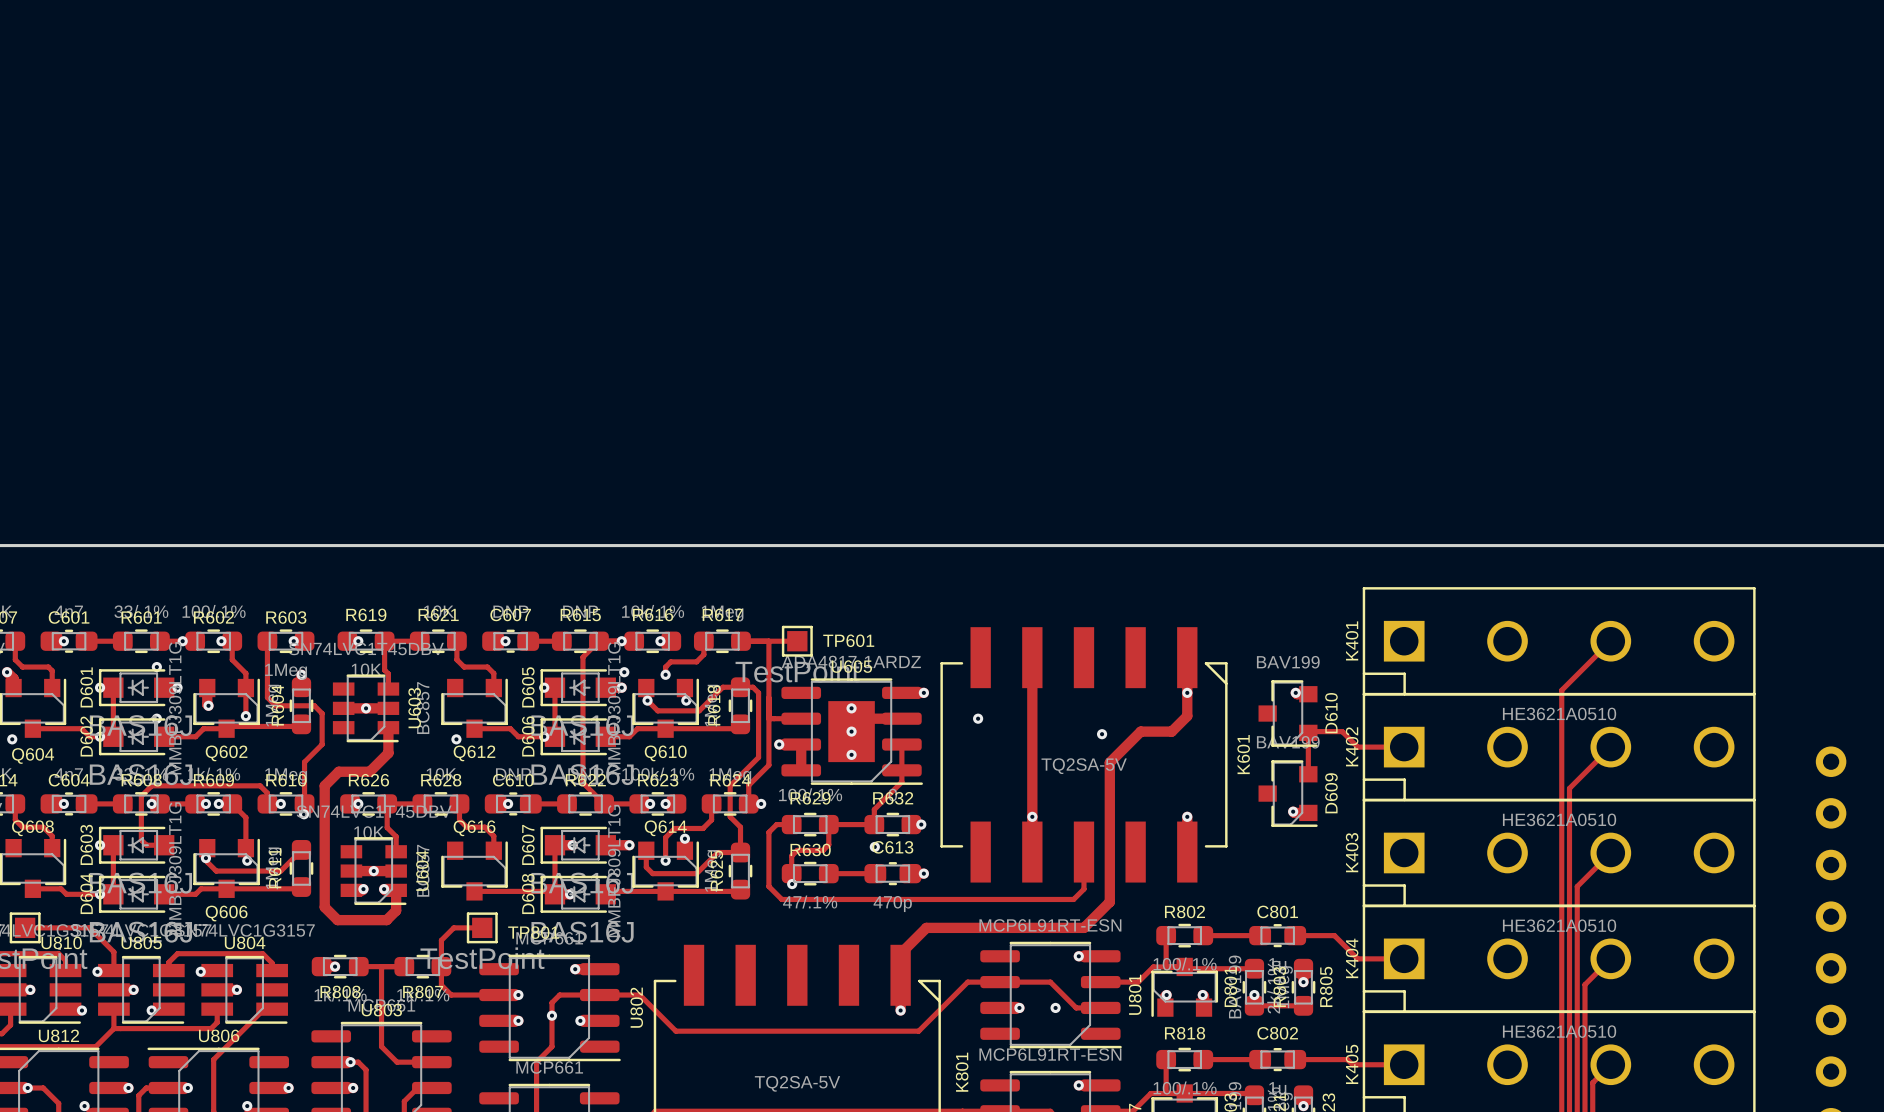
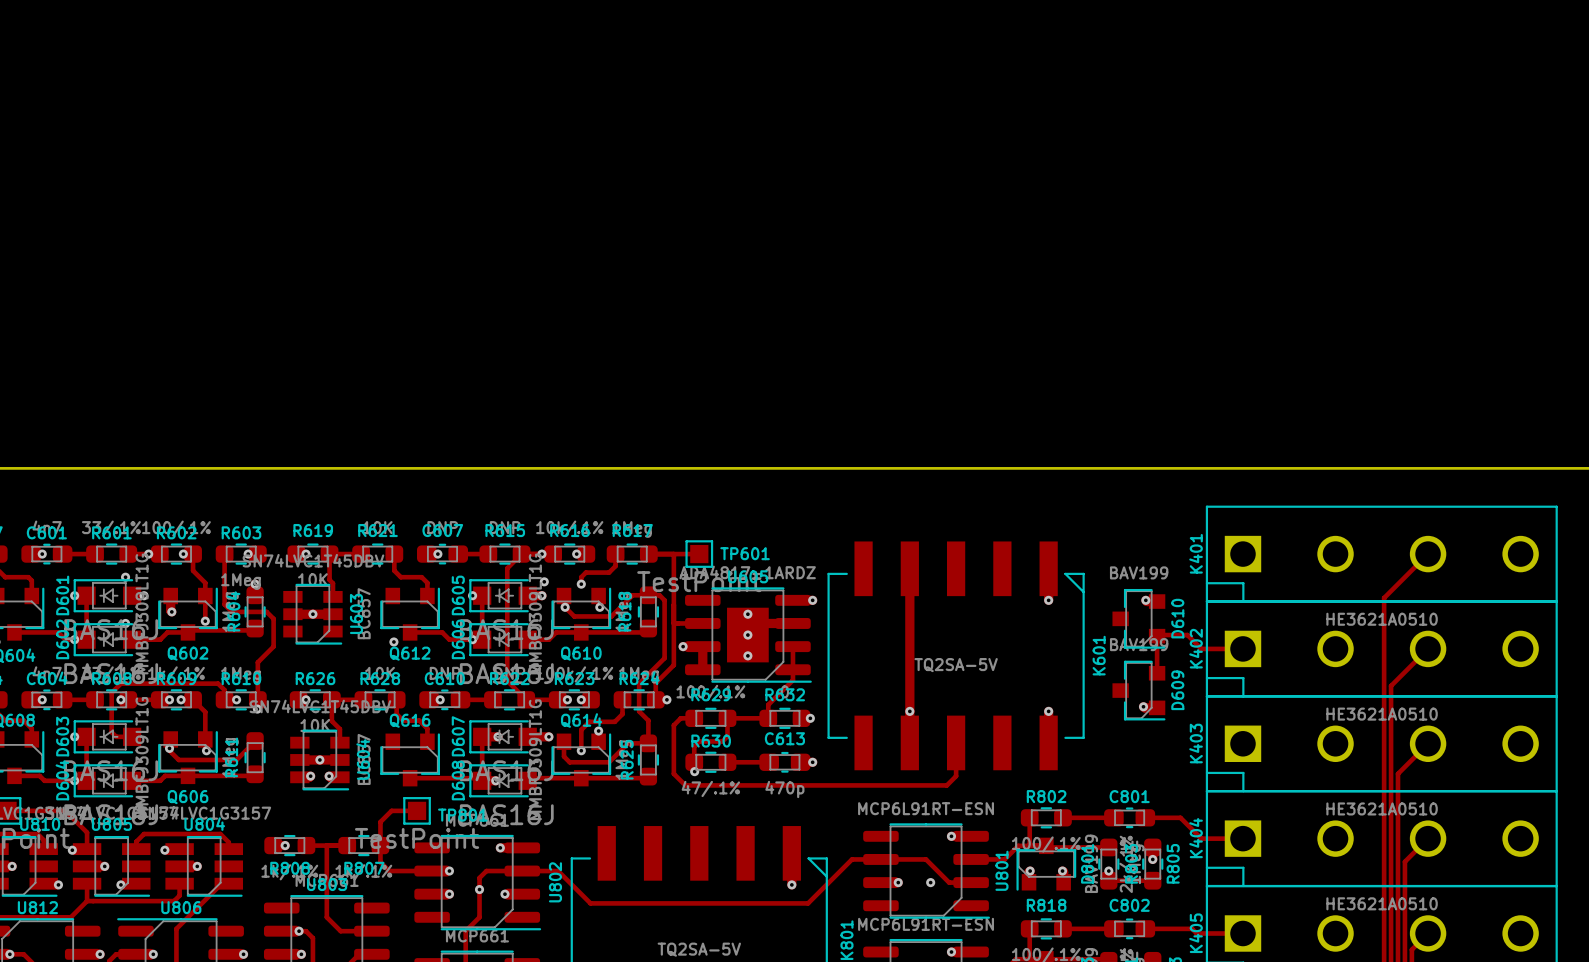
track: (1187, 692) (1187, 716) (1171, 731) (1140, 731) (1109, 762) (1109, 902) (1083, 927) (926, 927) (900, 953) (900, 975) -> none
via: (978, 718) -> none
track: (388, 727) (388, 753) (369, 771) (338, 771) (324, 785) (324, 907) (337, 920) (386, 920) (396, 910) (396, 890) -> none
via: (1102, 734) -> none
via: (874, 846) -> none

